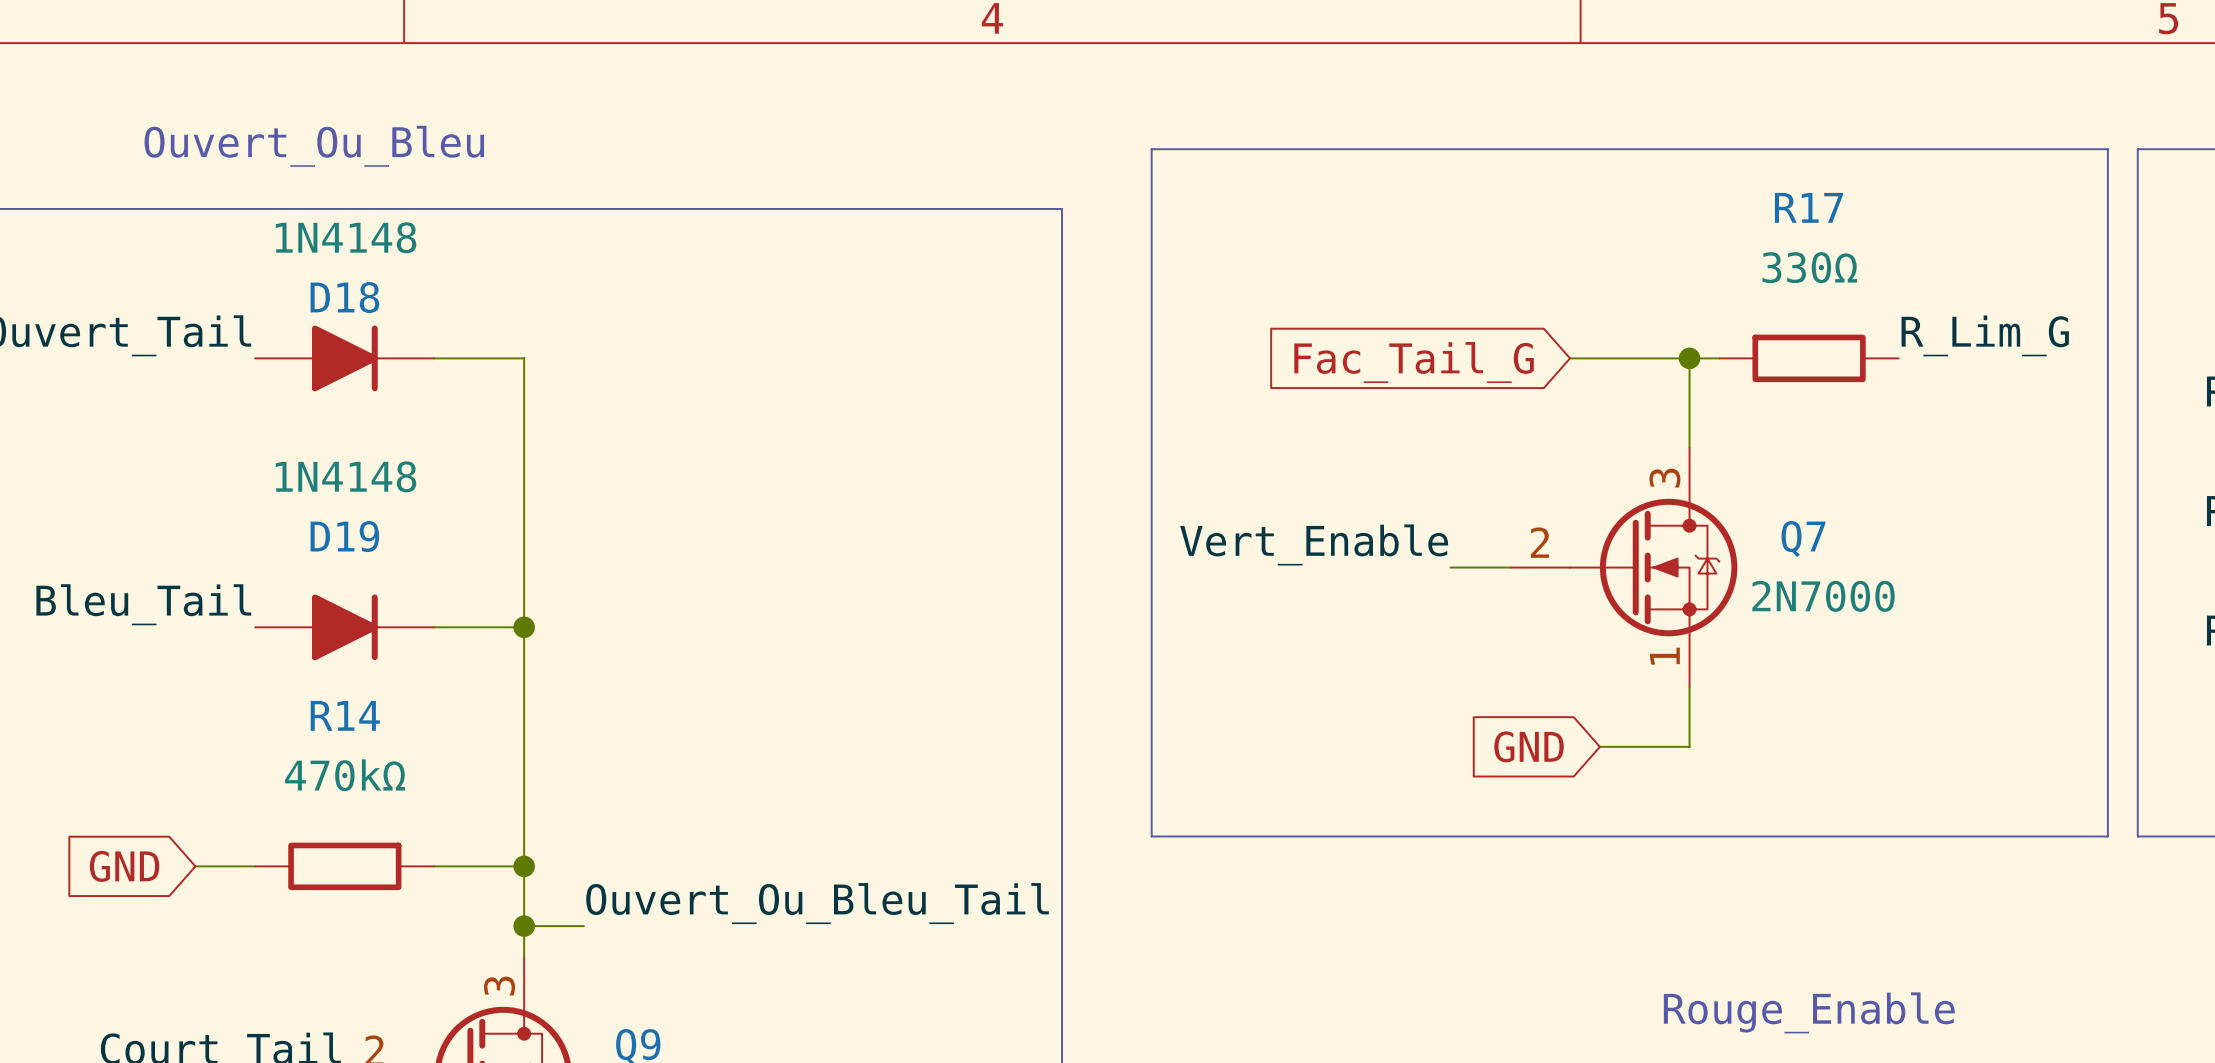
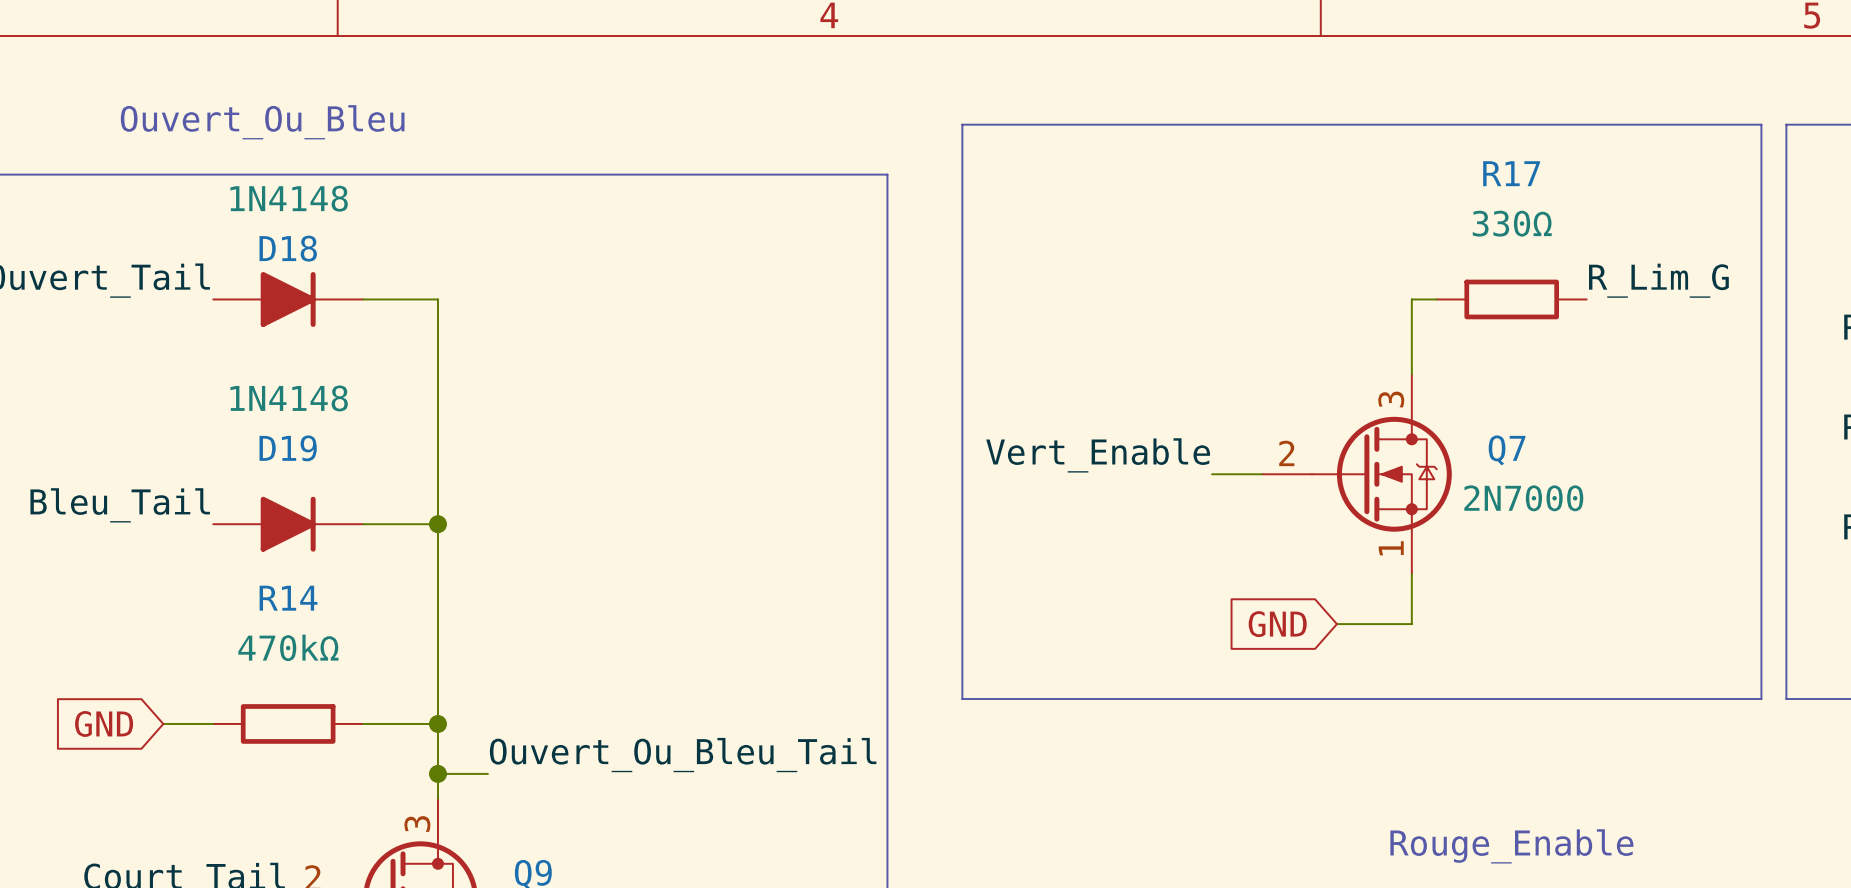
wire: (1570, 358) (1689, 358) -> none
junction: (1689, 358) -> none
global label: Fac_Tail_G (1414, 362) -> none

